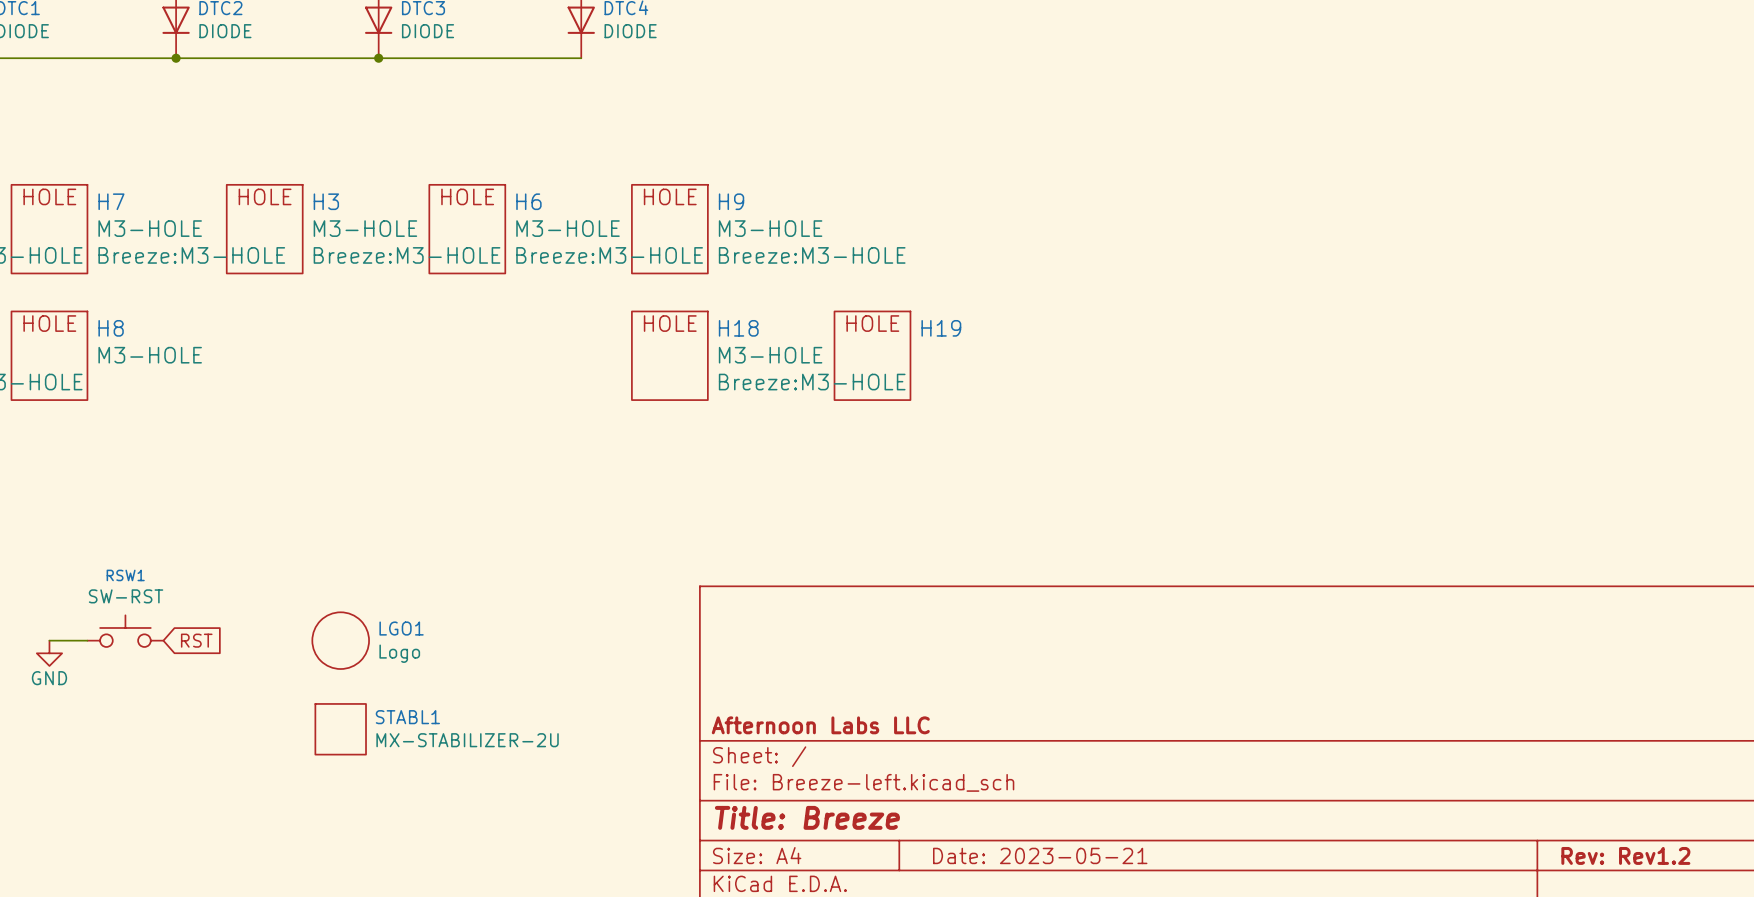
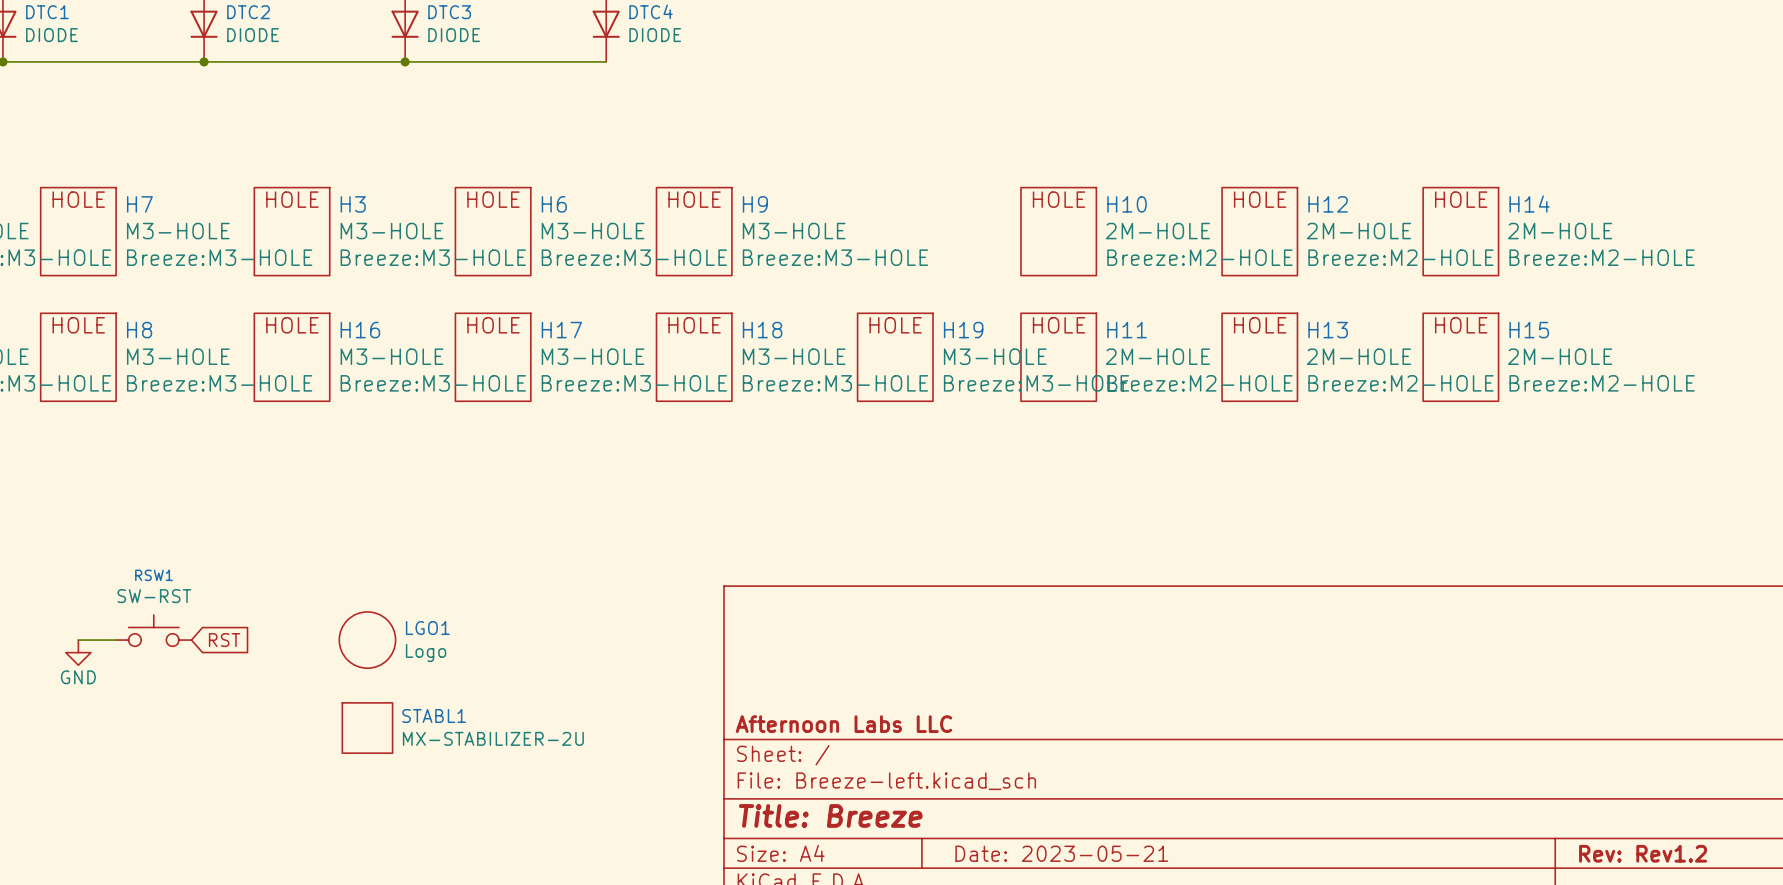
H10: none -> 2M-HOLE (1058, 231)
H12: none -> 2M-HOLE (1259, 231)
H14: none -> 2M-HOLE (1460, 231)
H16: none -> M3-HOLE (292, 357)
H17: none -> M3-HOLE (493, 357)
H19 value: none -> M3-HOLE (995, 356)
H11: none -> 2M-HOLE (1058, 357)
H13: none -> 2M-HOLE (1259, 357)
H15: none -> 2M-HOLE (1460, 357)
H8 text: none -> Breeze:M3-HOLE (219, 383)
H19 text: none -> Breeze:M3-HOLE (1036, 383)

